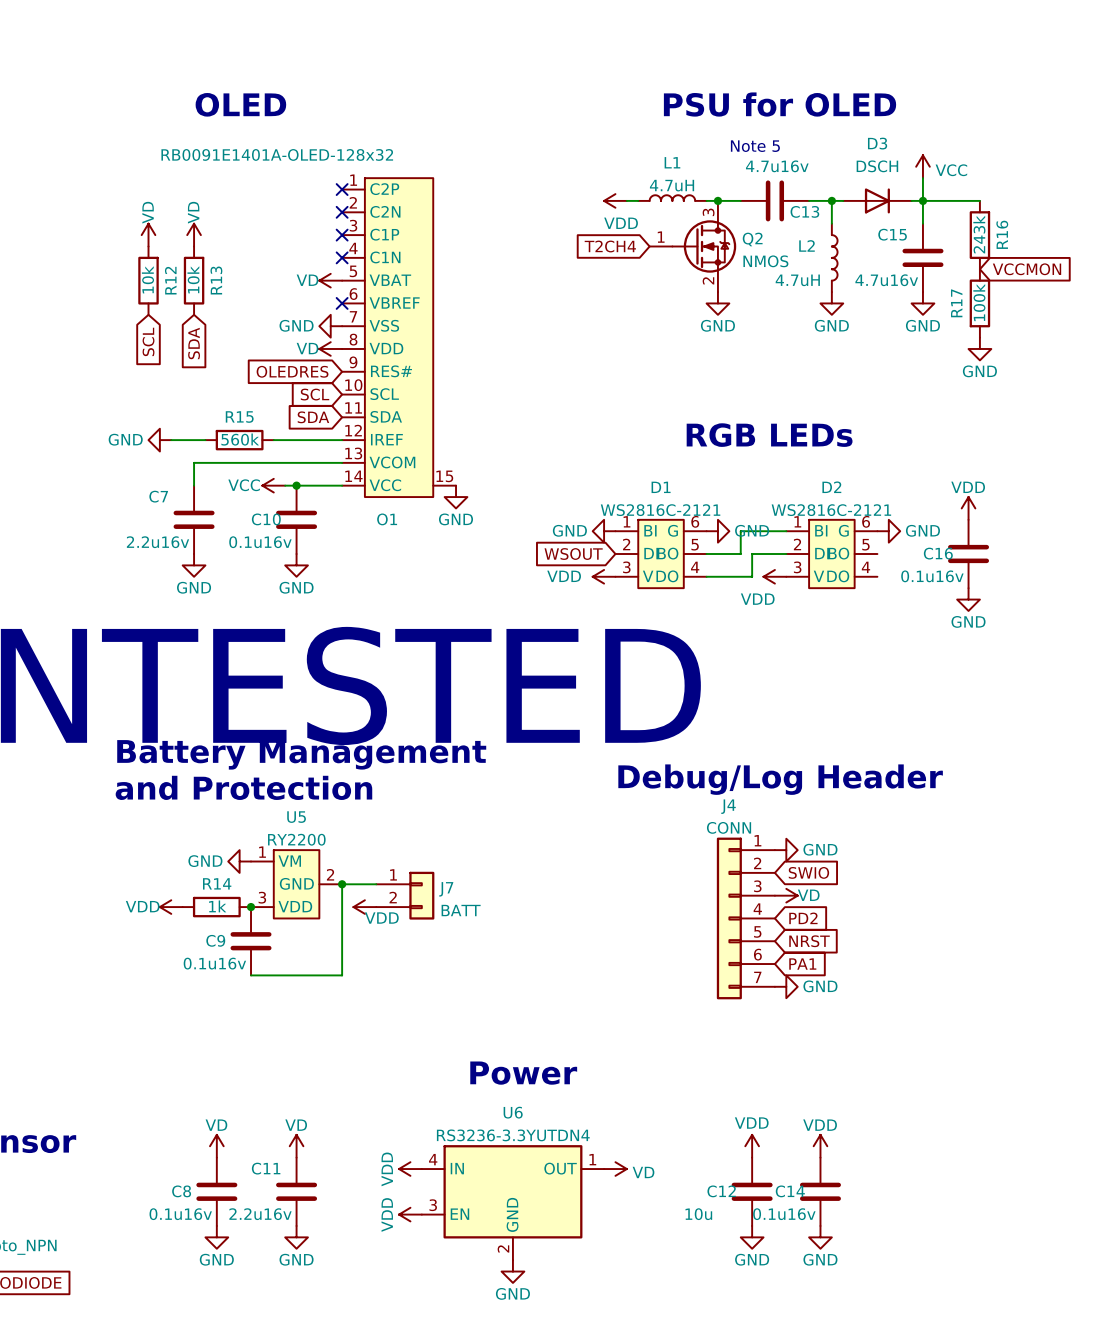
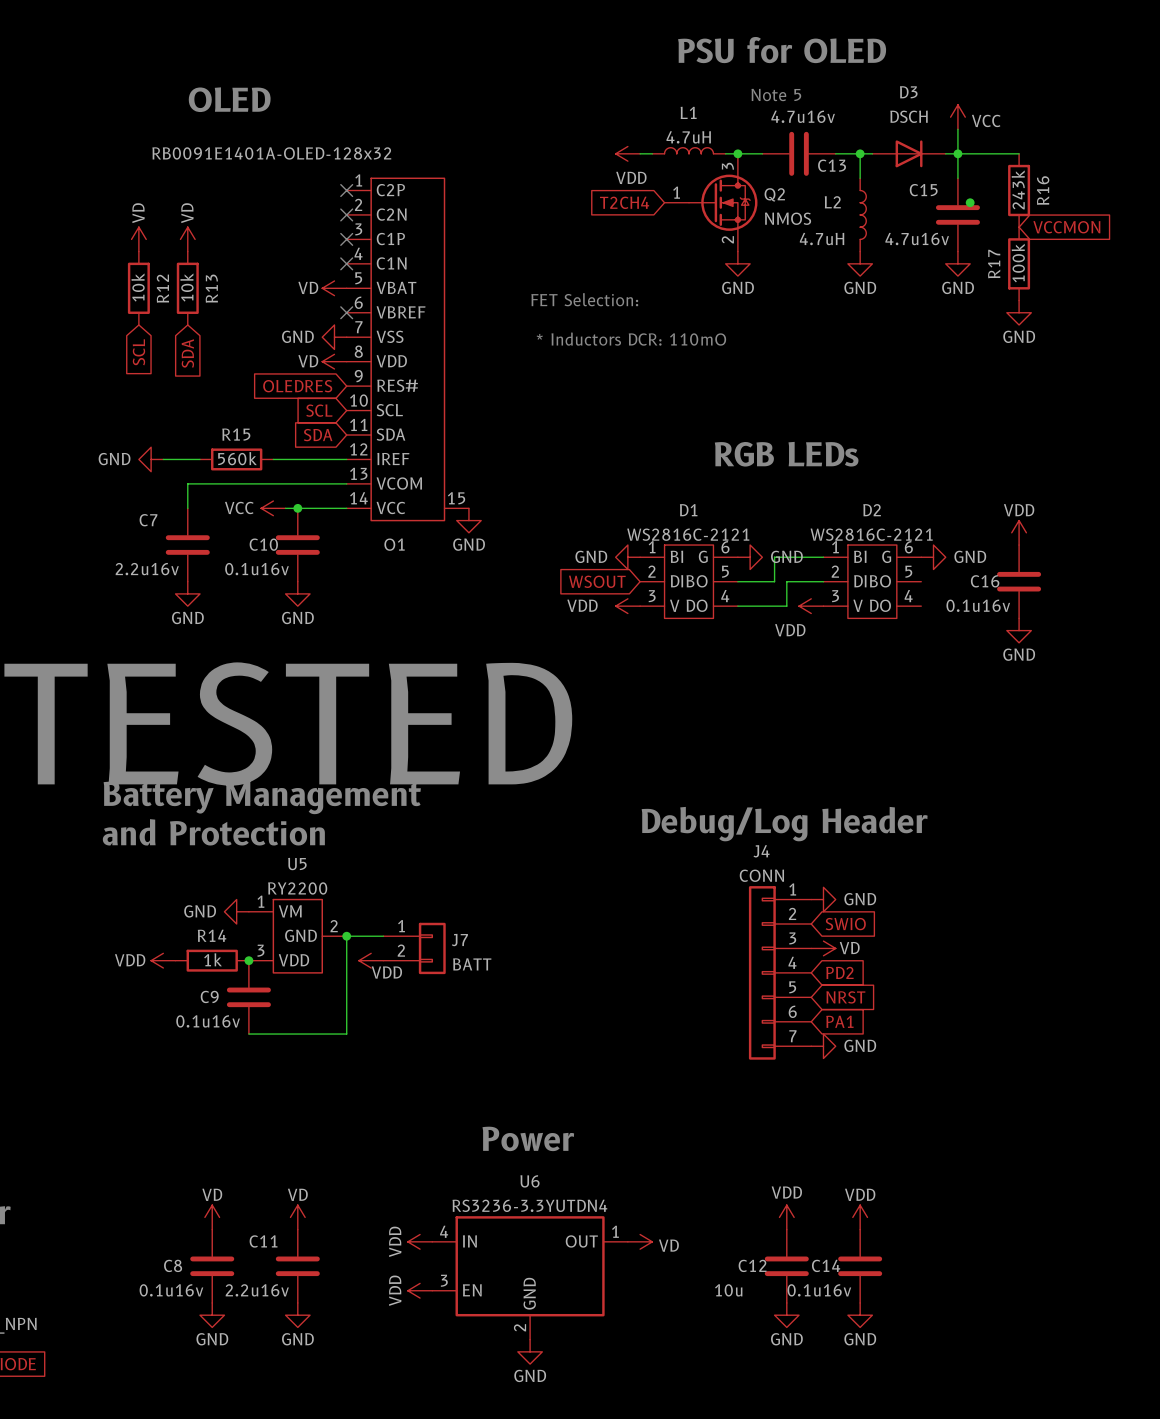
text position: PSU for OLED (780, 104) -> PSU for OLED (782, 50)
text position: Note 5 (755, 146) -> Note 5 (776, 94)
junction: none -> (860, 153)
junction: none -> (957, 153)
power symbol position: VCC (922, 166) -> VCC (957, 117)
wire: (922, 178) (922, 223) -> (957, 129) (957, 178)
L1 position: (672, 198) -> (689, 150)
power symbol position: VDD (615, 200) -> VDD (627, 153)
wire: (626, 200) (638, 200) -> (640, 153) (652, 153)
wire: (706, 200) (740, 200) -> (725, 153) (762, 153)
junction position: (717, 200) -> (737, 153)
C13 position: (774, 200) -> (799, 153)
wire: (809, 200) (843, 200) -> (835, 153) (872, 153)
wire: (831, 200) (831, 223) -> (860, 153) (860, 178)
junction: (831, 200) -> none
D3 position: (877, 200) -> (909, 153)
wire: (911, 200) (979, 200) -> (945, 153) (1019, 153)
R16 position: (979, 235) -> (1019, 190)
global label position: T2CH4 (610, 246) -> T2CH4 (624, 202)
Q2 position: (692, 246) -> (711, 202)
power symbol: none -> GND (860, 263)
L2 position: (834, 257) -> (863, 214)
power symbol: none -> GND (957, 263)
C15 position: (922, 257) -> (957, 214)
global label position: VCCMON (1027, 269) -> VCCMON (1066, 227)
text: none -> FET Selection: (584, 299)
power symbol position: GND (717, 303) -> GND (737, 263)
power symbol: GND (831, 303) -> none
power symbol: GND (922, 303) -> none
power symbol: none -> GND (1019, 312)
R17 position: (979, 303) -> (1019, 263)
text: none -> * Inductors DCR: 110mO (631, 339)
power symbol: GND (979, 348) -> none

